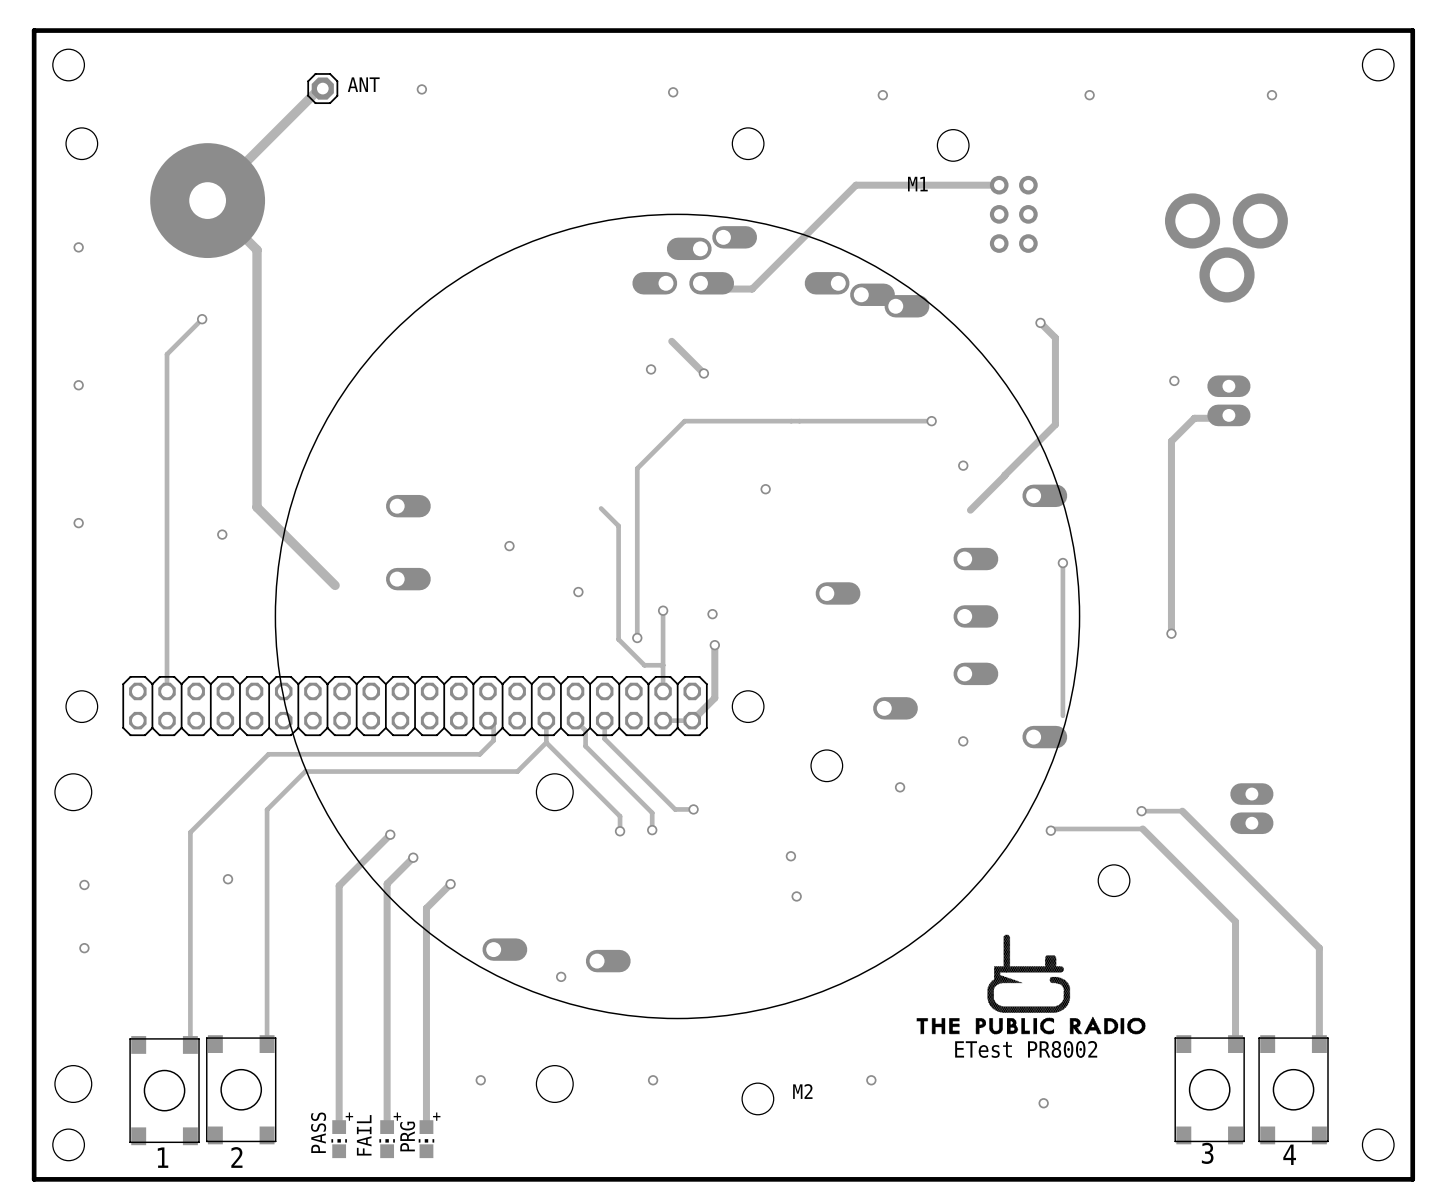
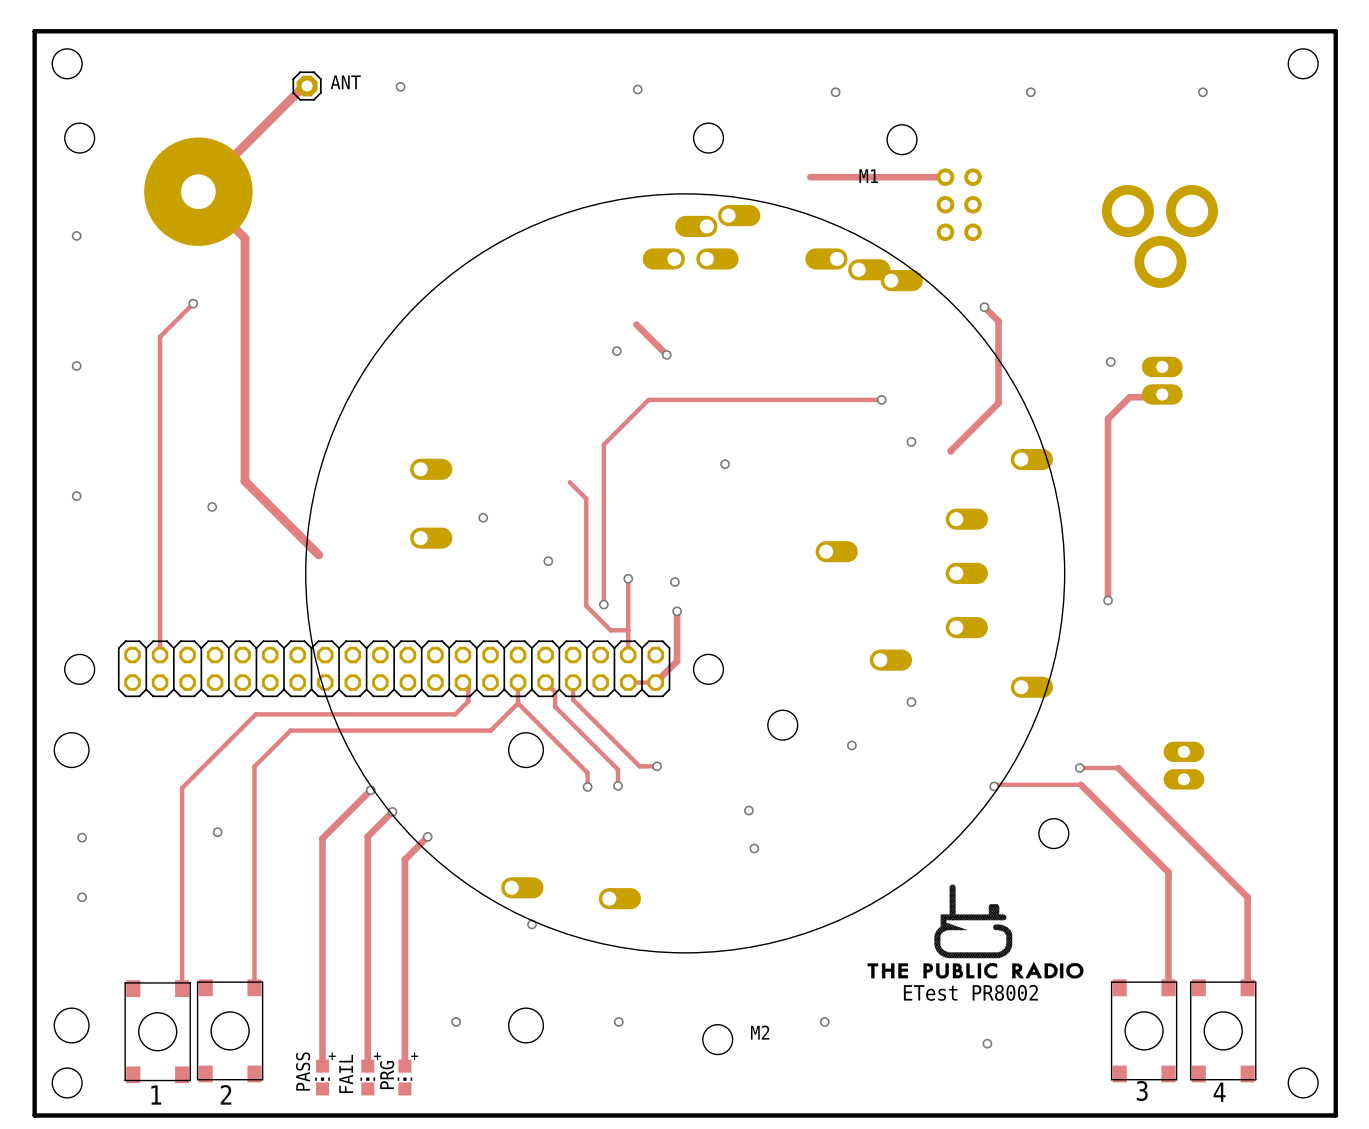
track: (856, 185) (752, 289) (709, 289) -> none
track: (1004, 475) (970, 510) -> none
track: (1062, 563) (1062, 715) -> none
via: (1062, 563) -> none
part position: (677, 616) -> (685, 573)

